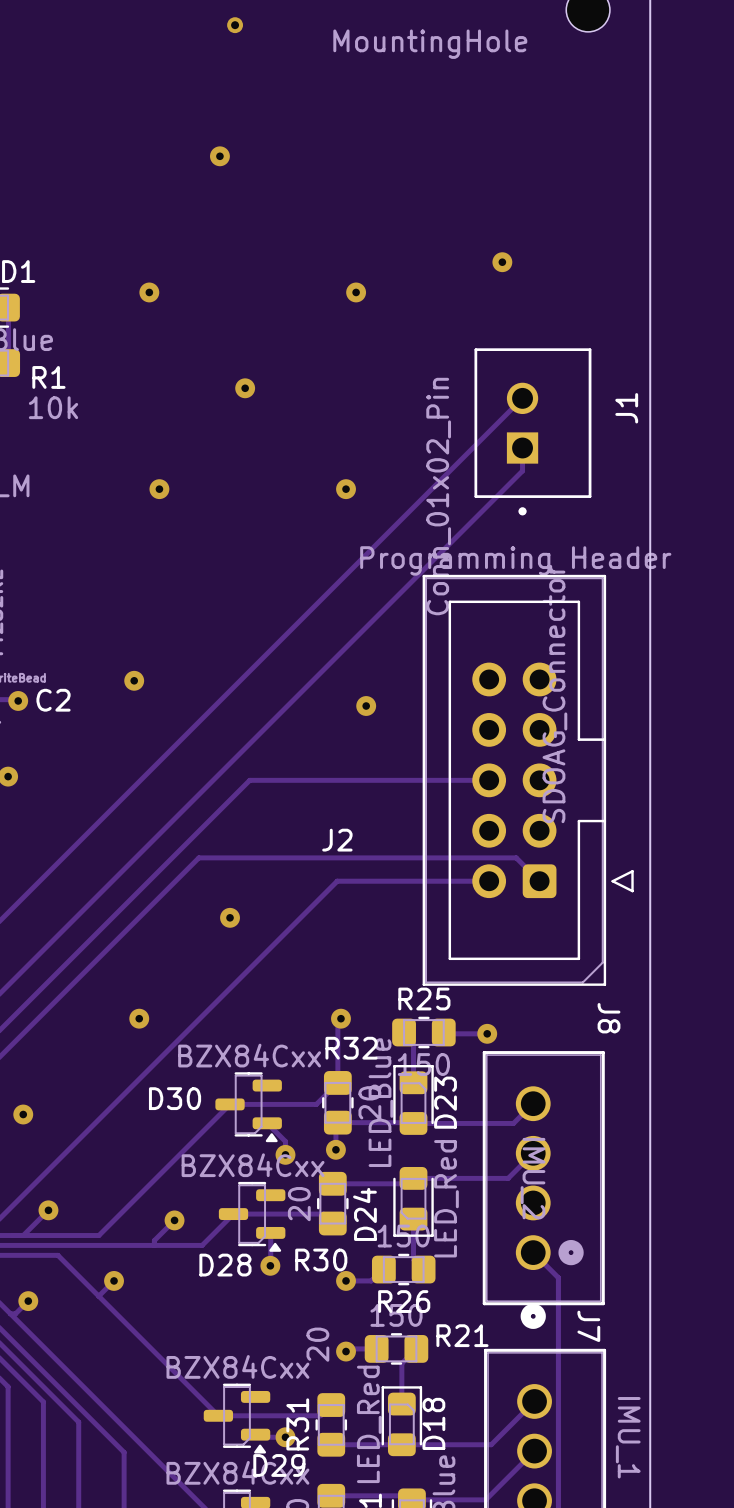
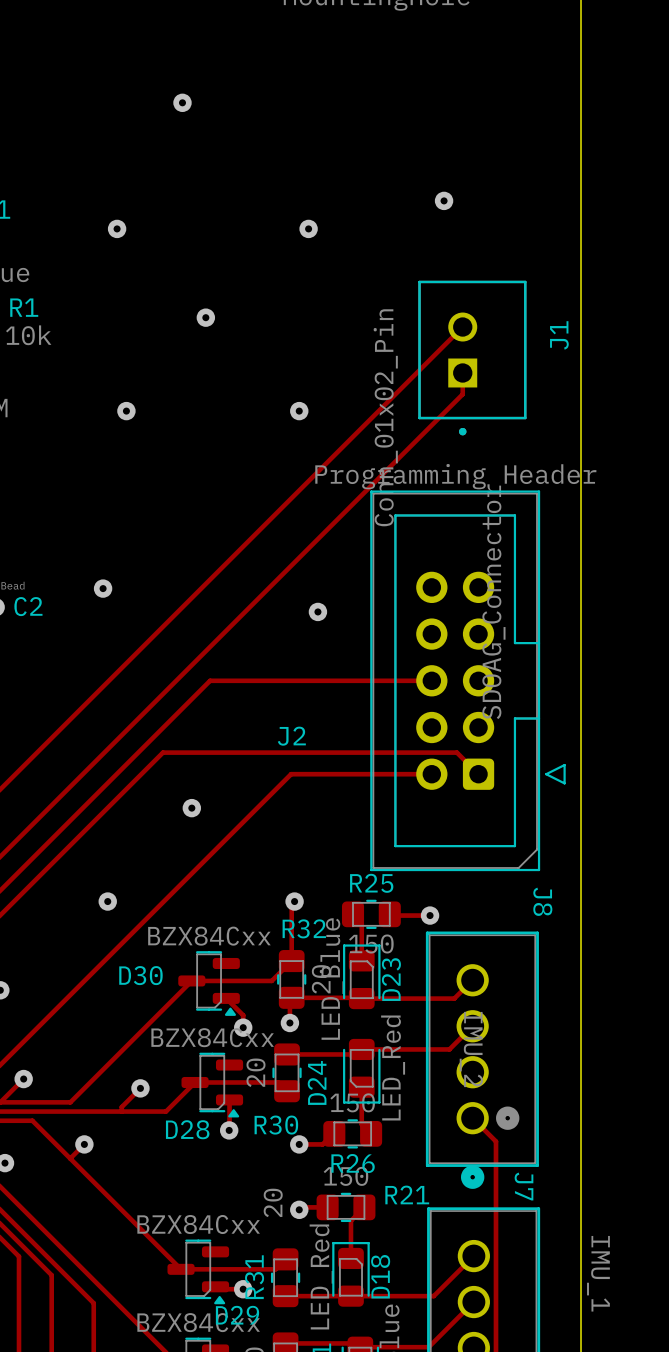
J7 value position: IMU_1 (628, 1437) -> IMU_1 (598, 1273)

